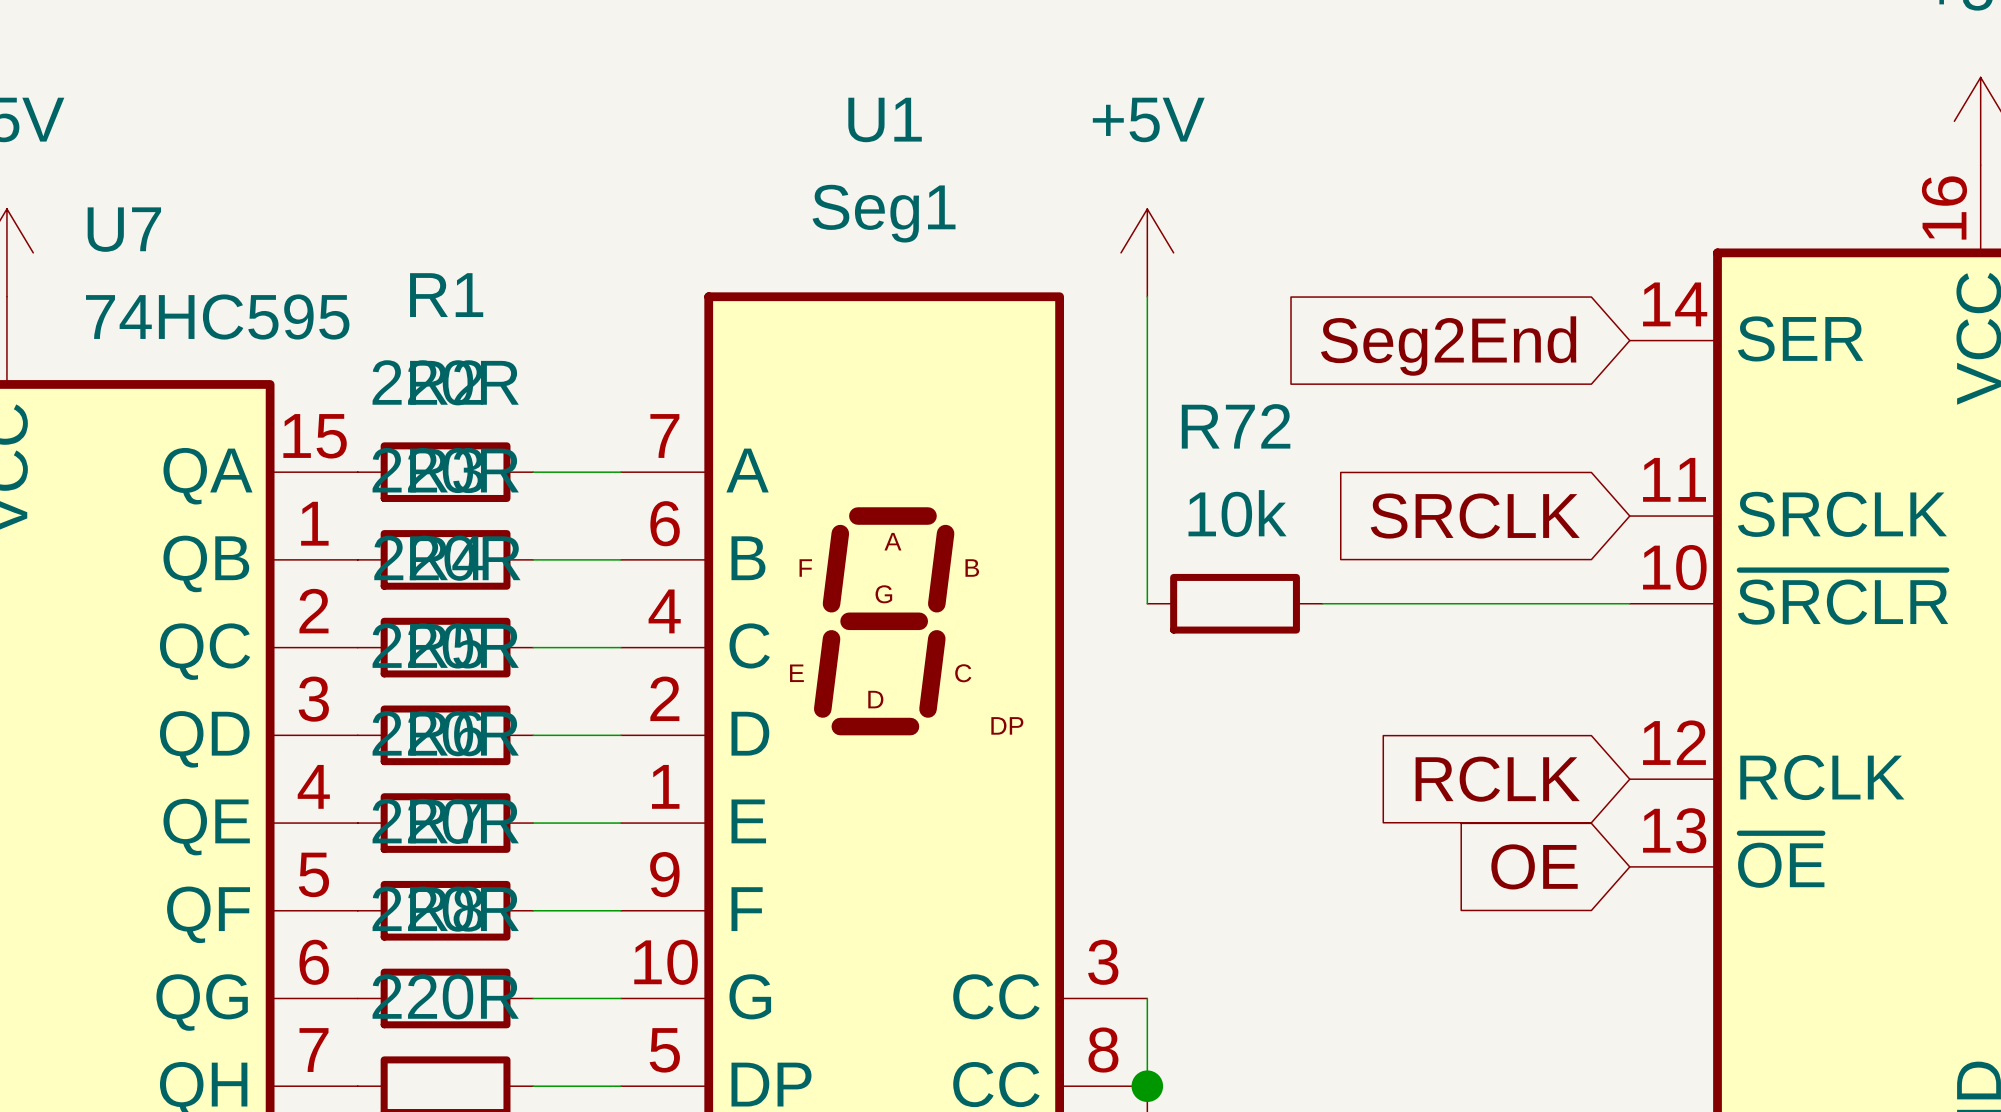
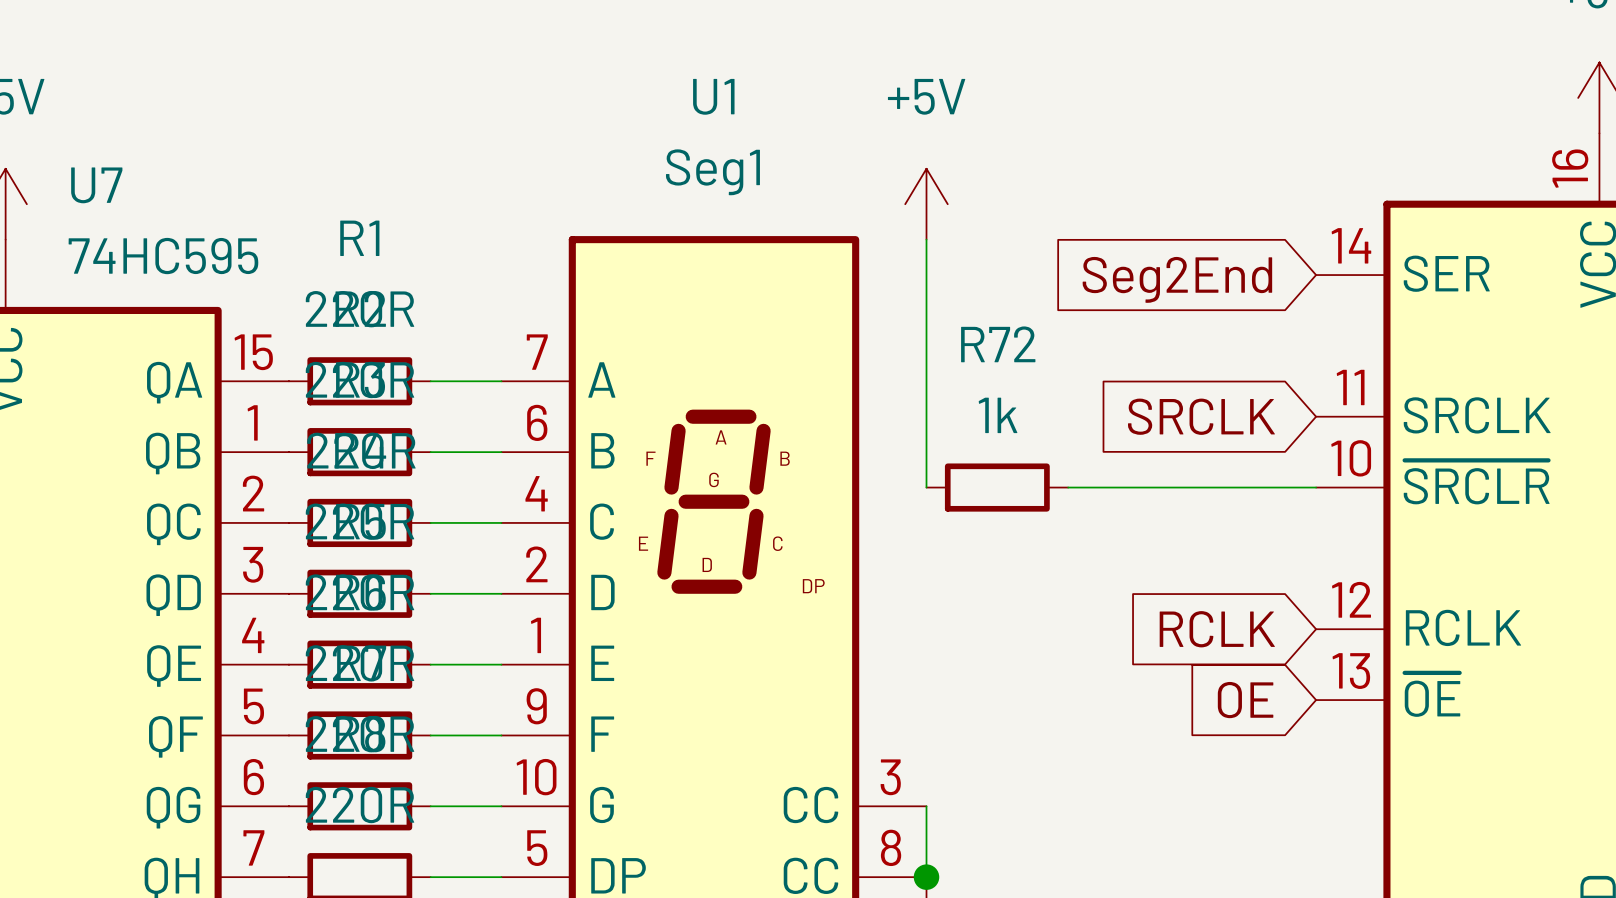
R72 value: 10k (1237, 513) -> 1k (998, 415)

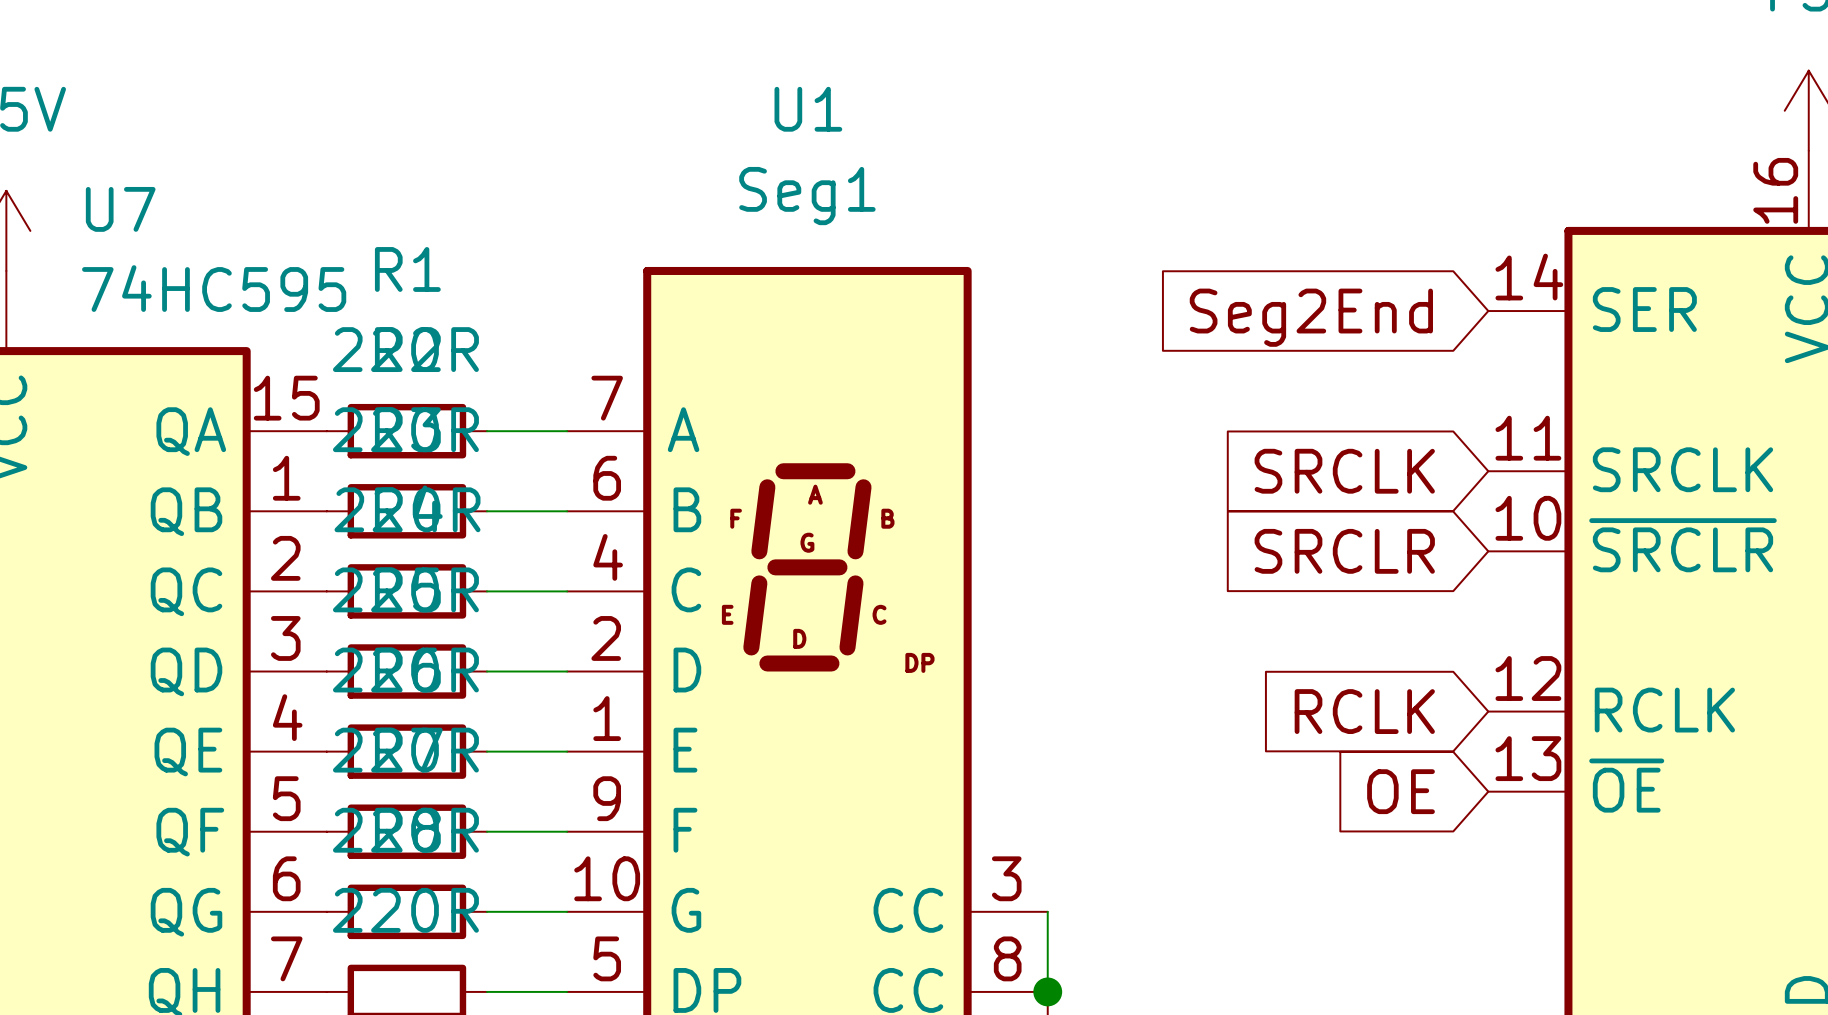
power symbol: +5V (926, 204) -> none
wire: (926, 239) (926, 487) -> none
R72: 1k (997, 487) -> none
wire: (1068, 487) (1316, 487) -> none
global label: none -> SRCLR (1344, 551)

